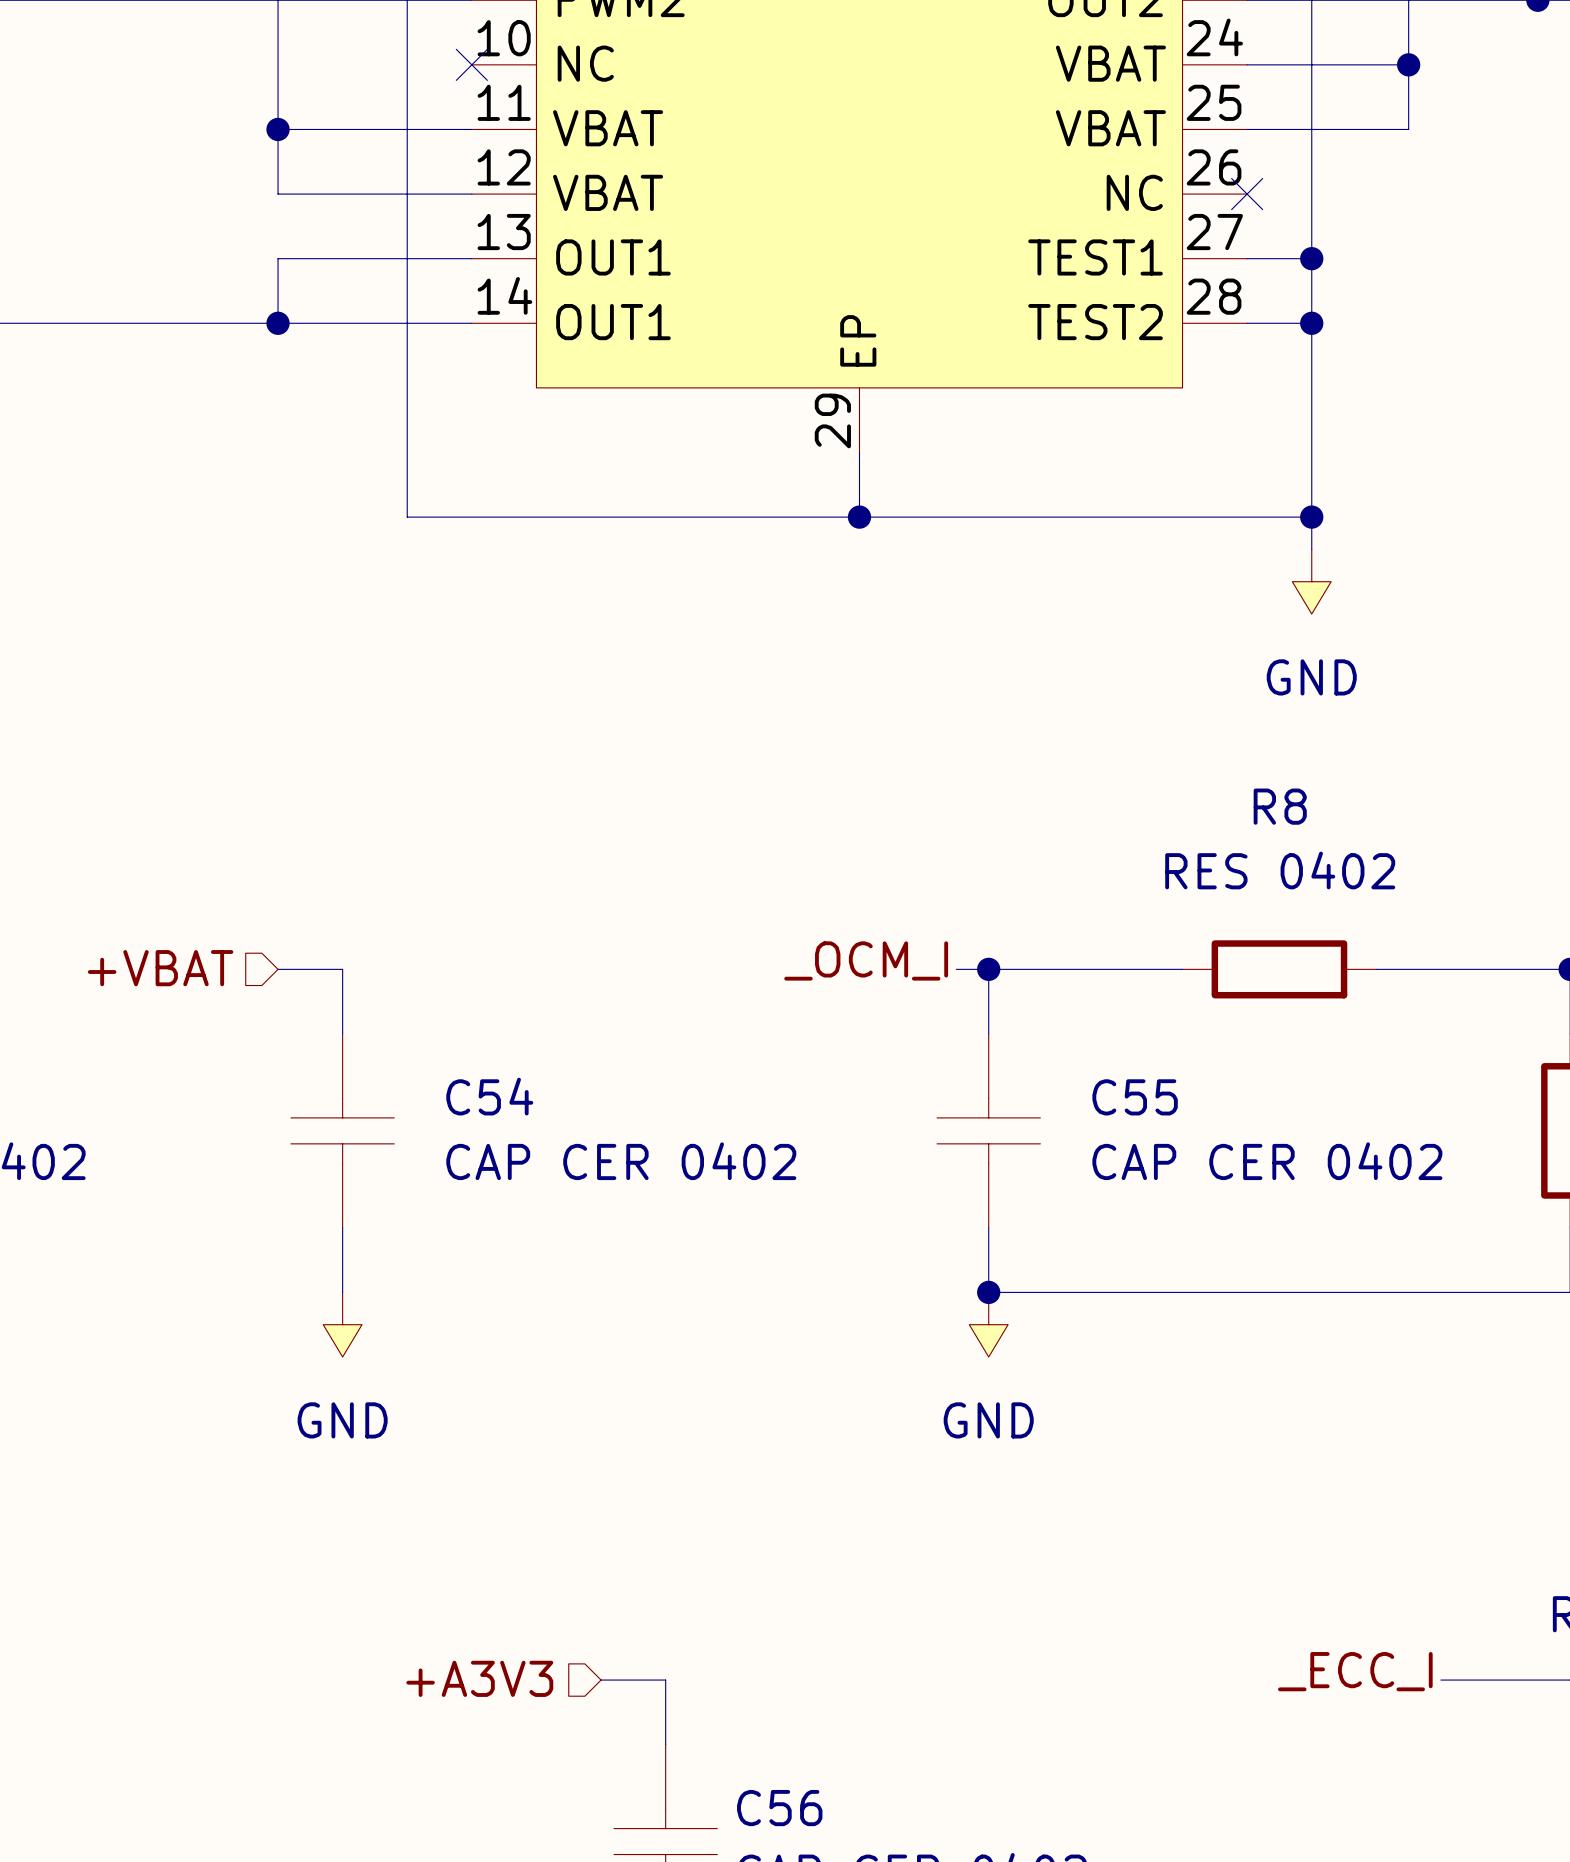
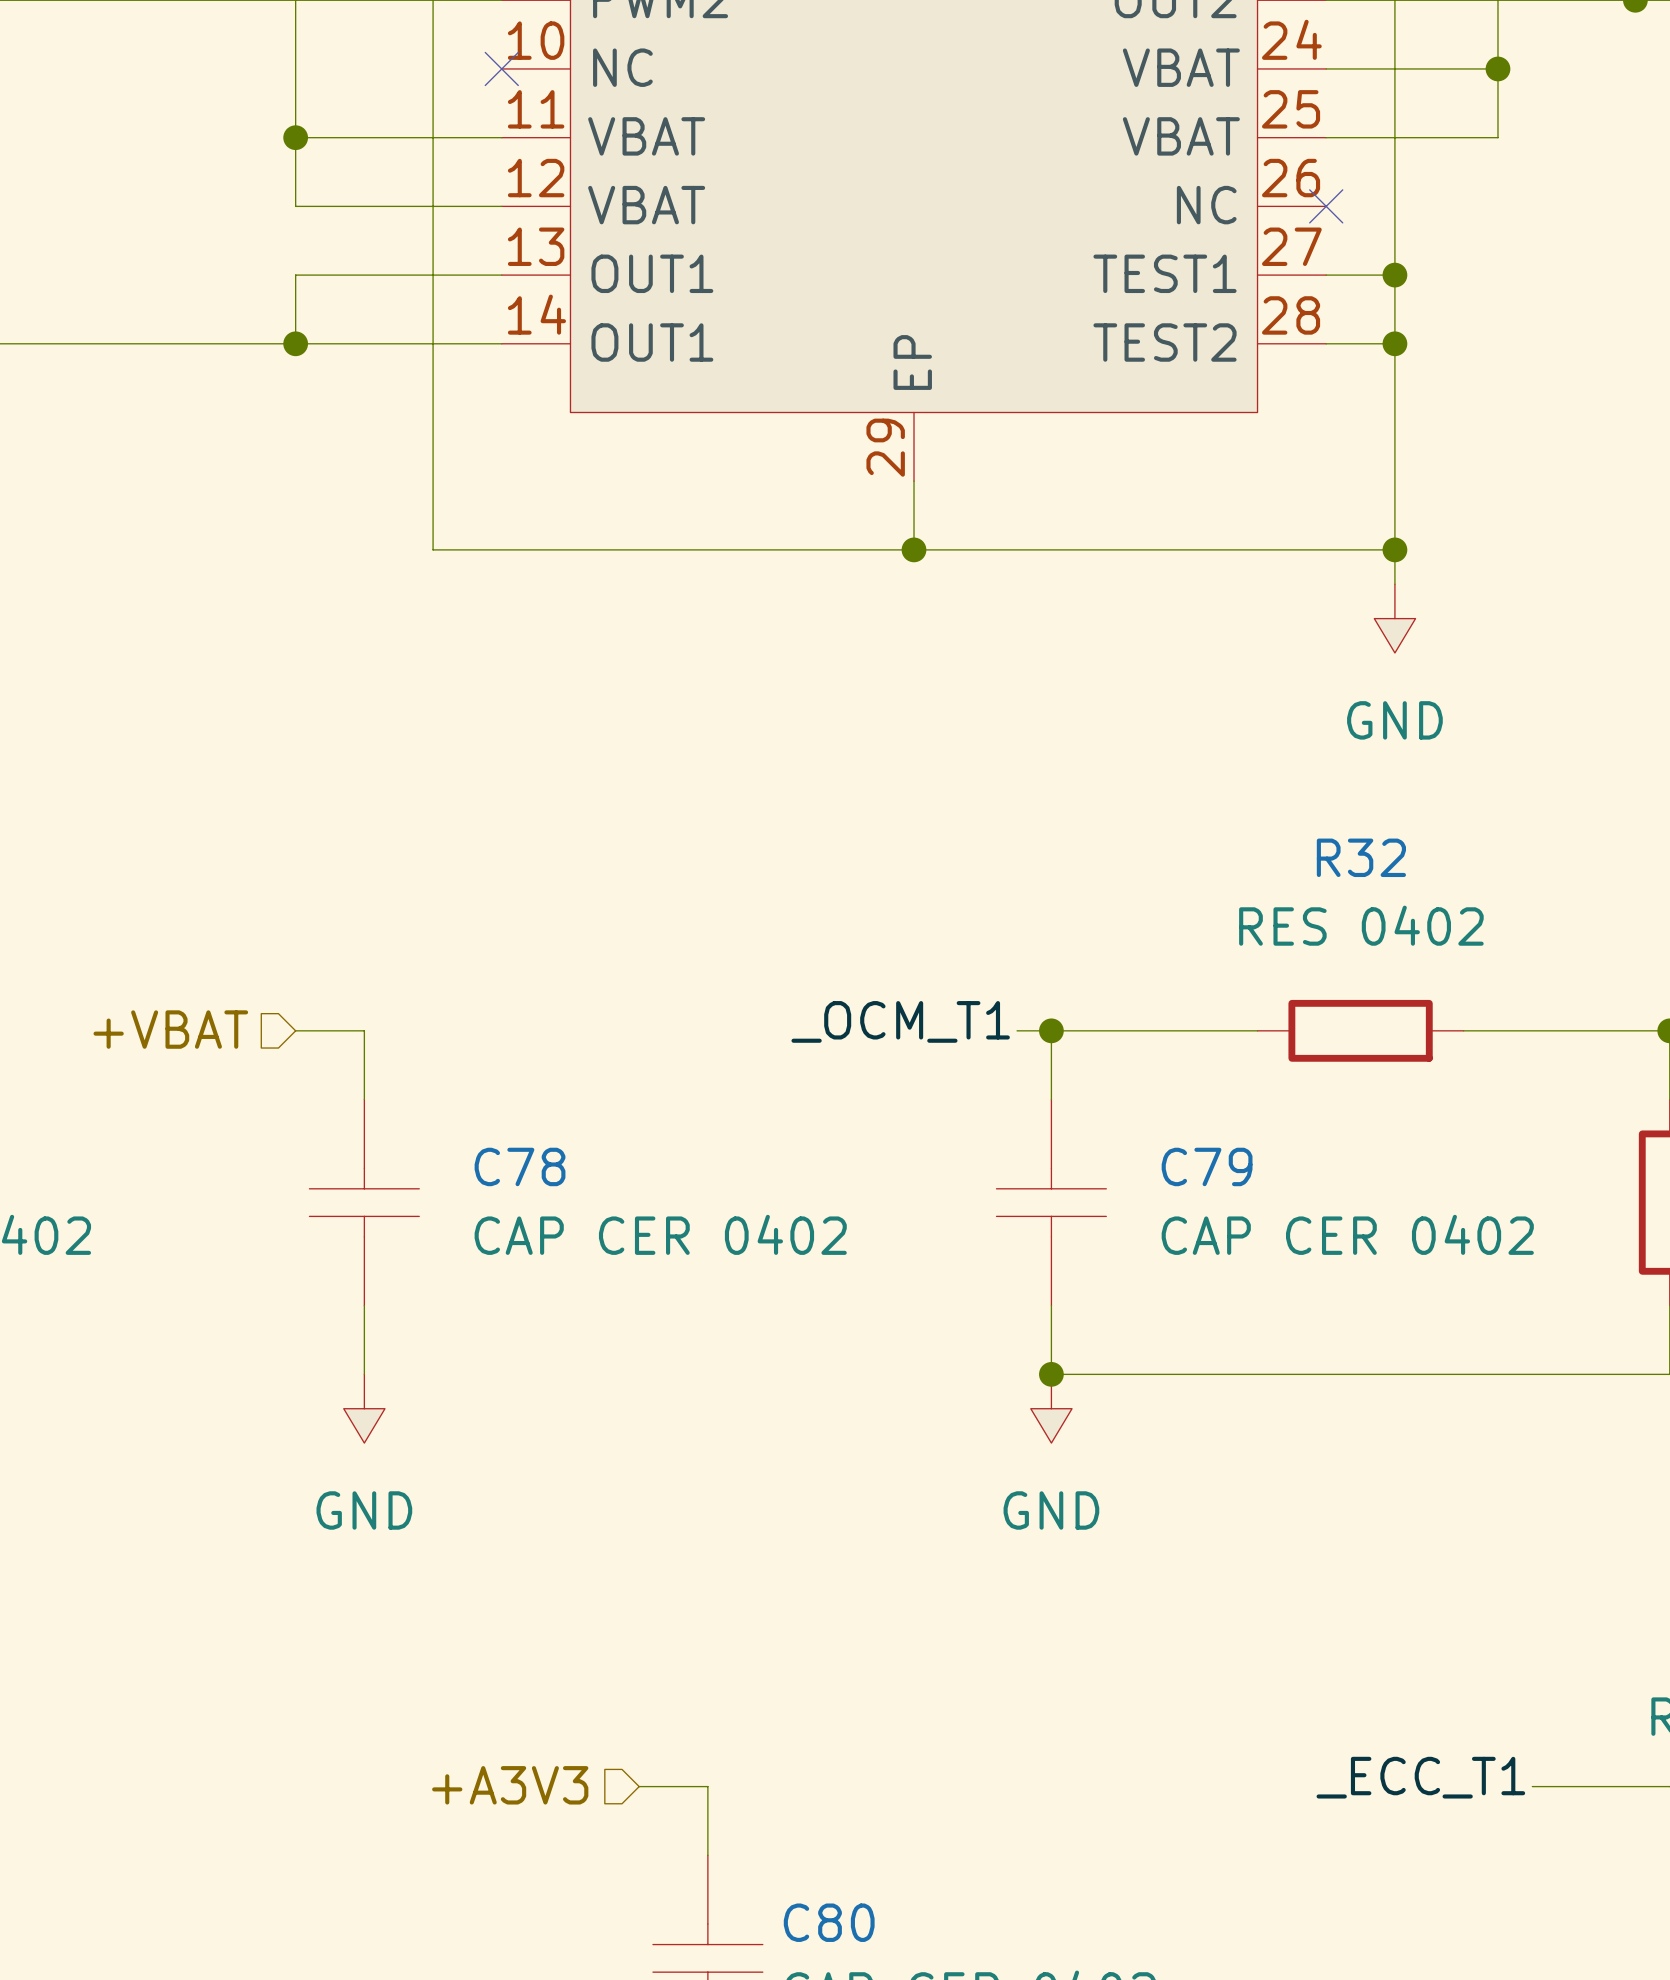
R8 name: R8 (1280, 806) -> R32 (1361, 857)
label: _OCM_I (866, 960) -> _OCM_T1 (900, 1021)
C54 name: C54 (489, 1096) -> C78 (520, 1166)
C55 name: C55 (1135, 1097) -> C79 (1207, 1166)
label: _ECC_I (1355, 1671) -> _ECC_T1 (1420, 1777)
C56 name: C56 (779, 1808) -> C80 (829, 1922)

